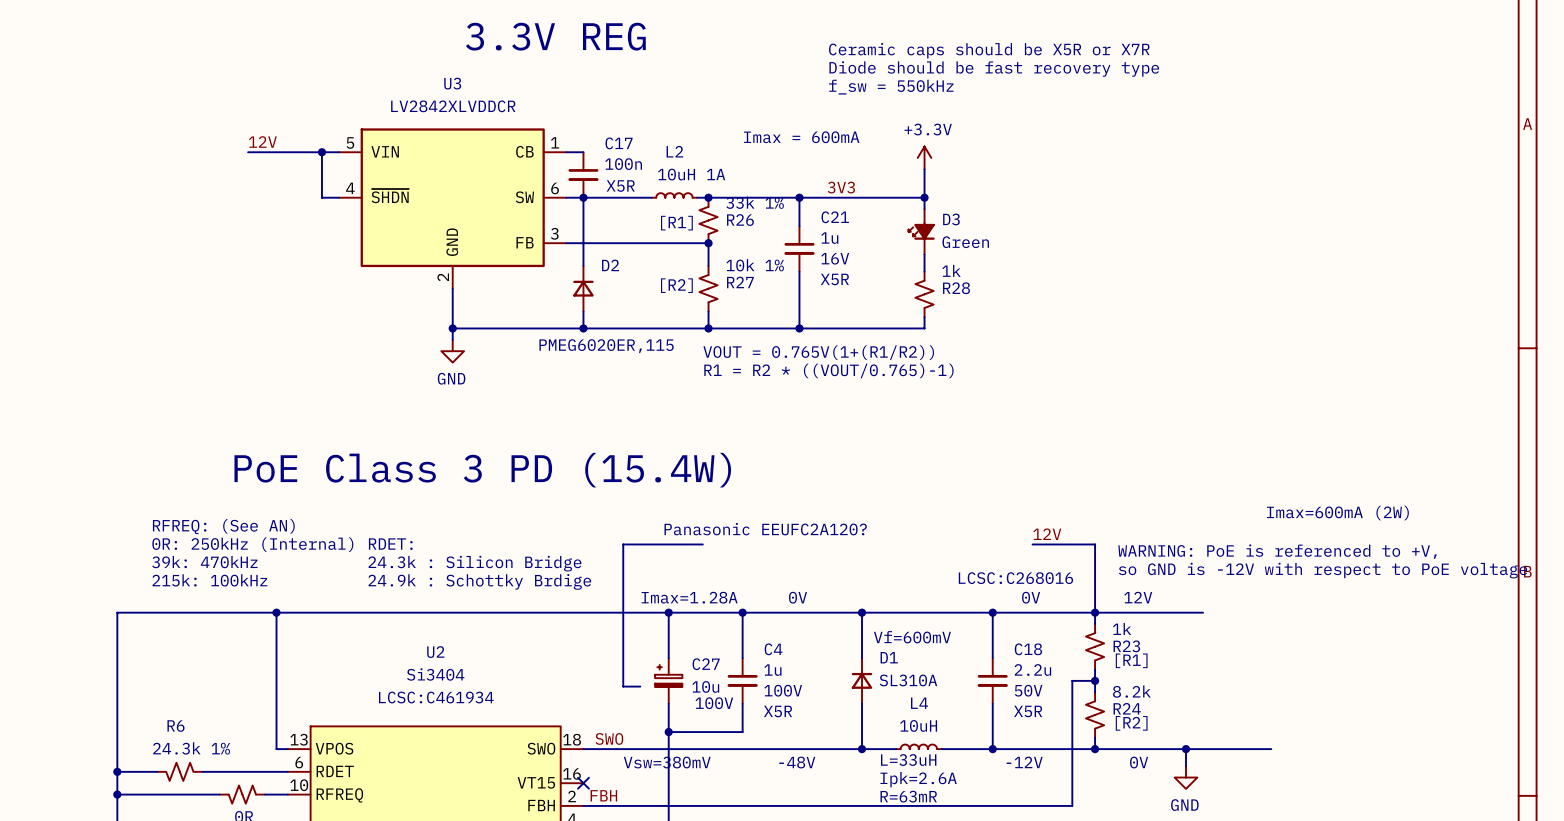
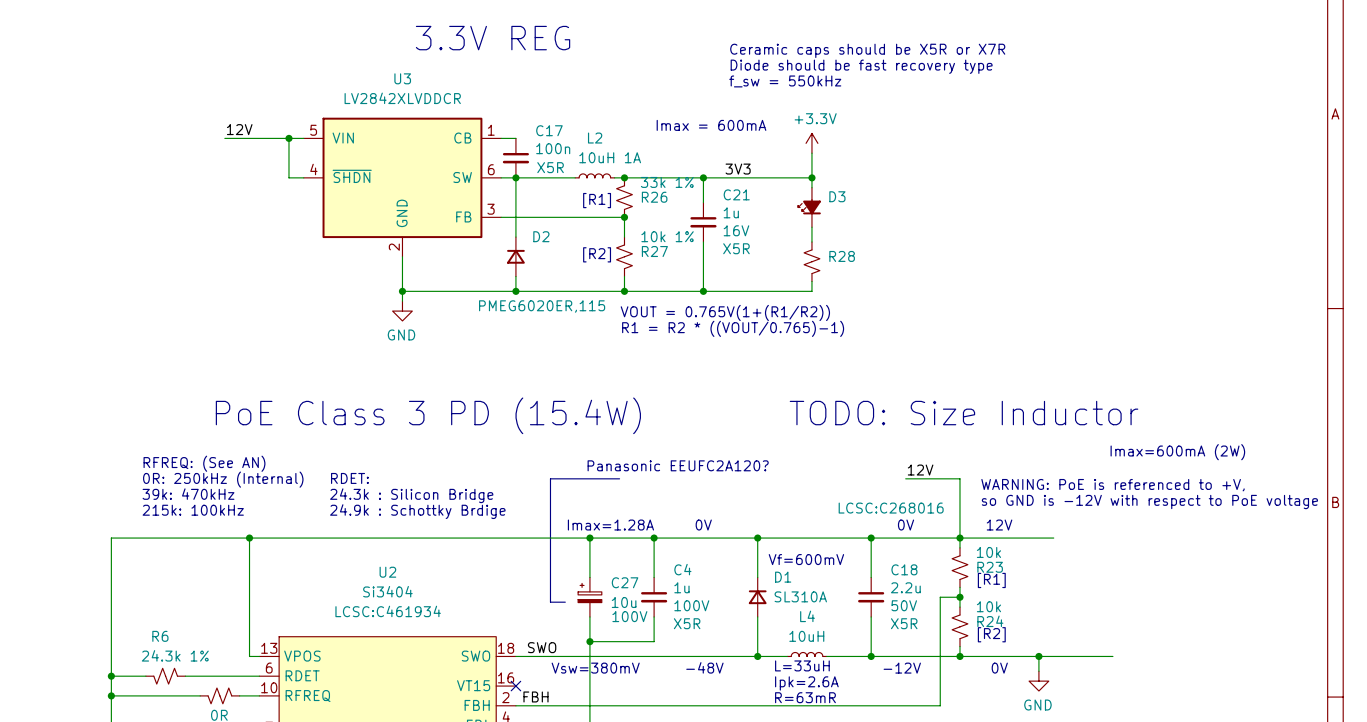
D3 value: Green (965, 242) -> none
R28 value: 1k (951, 270) -> none
text: none -> TODO: Size Inductor (964, 413)
R23 value: 1k (1122, 628) -> 10k (988, 552)
R24 value: 8.2k (1131, 691) -> 10k (988, 606)

